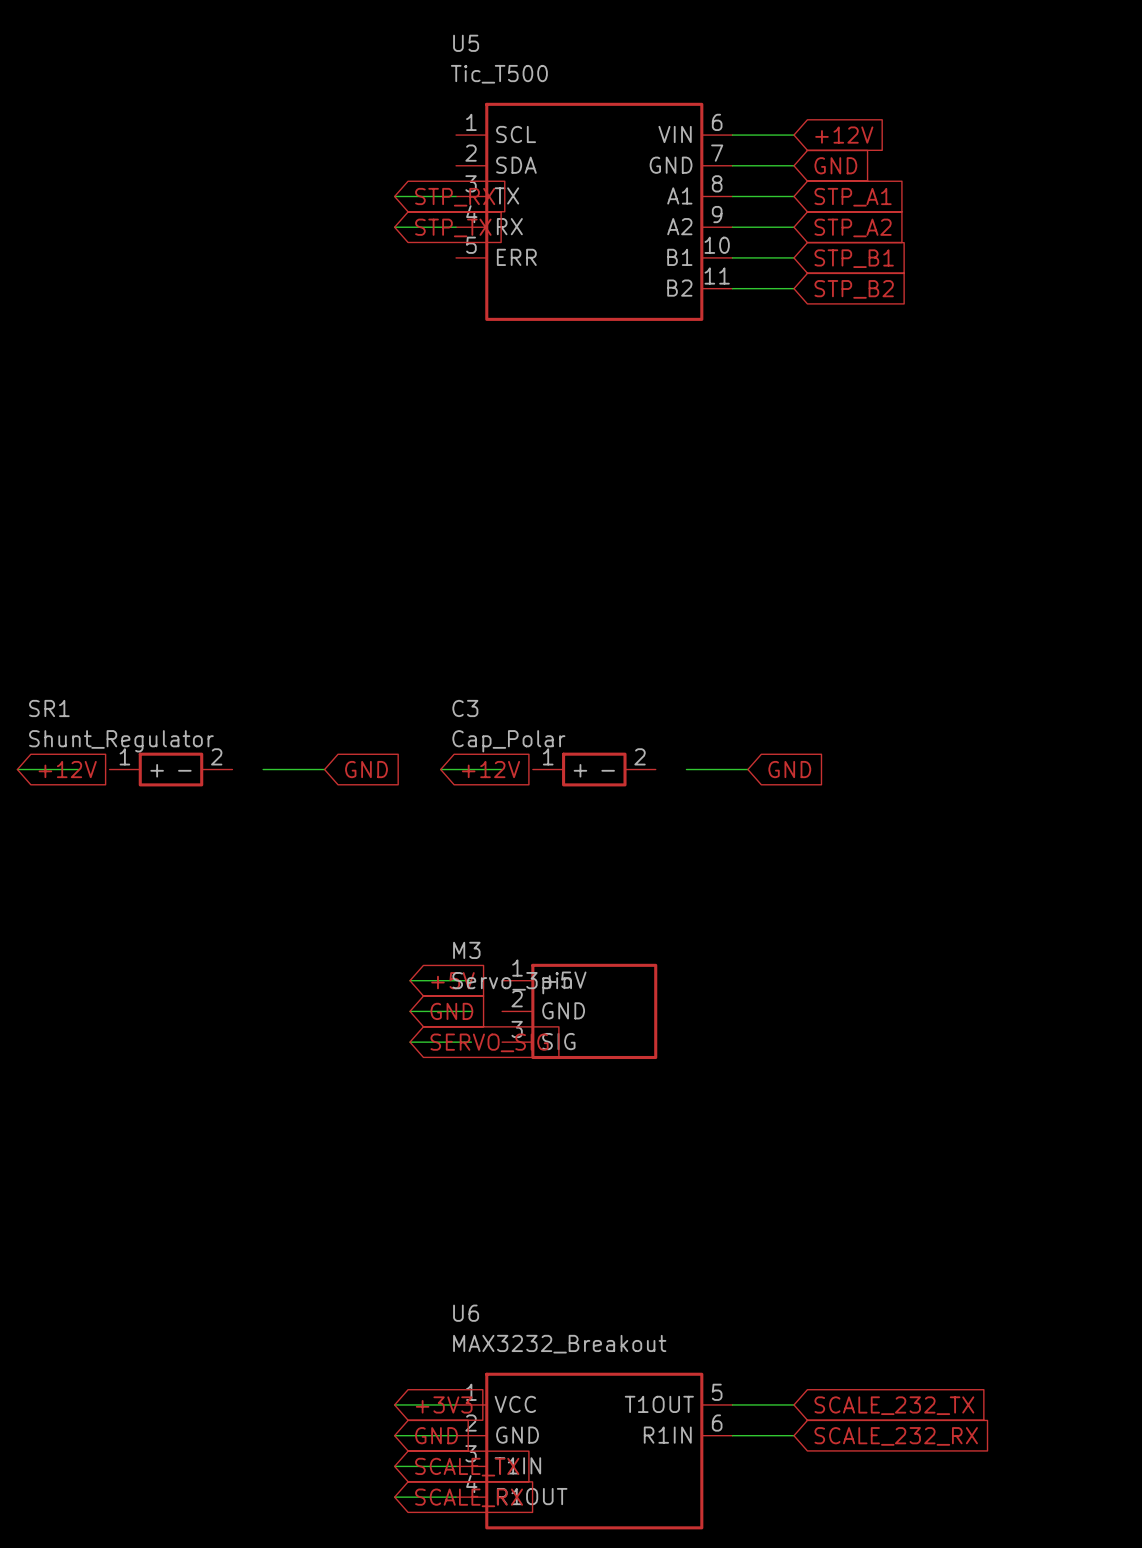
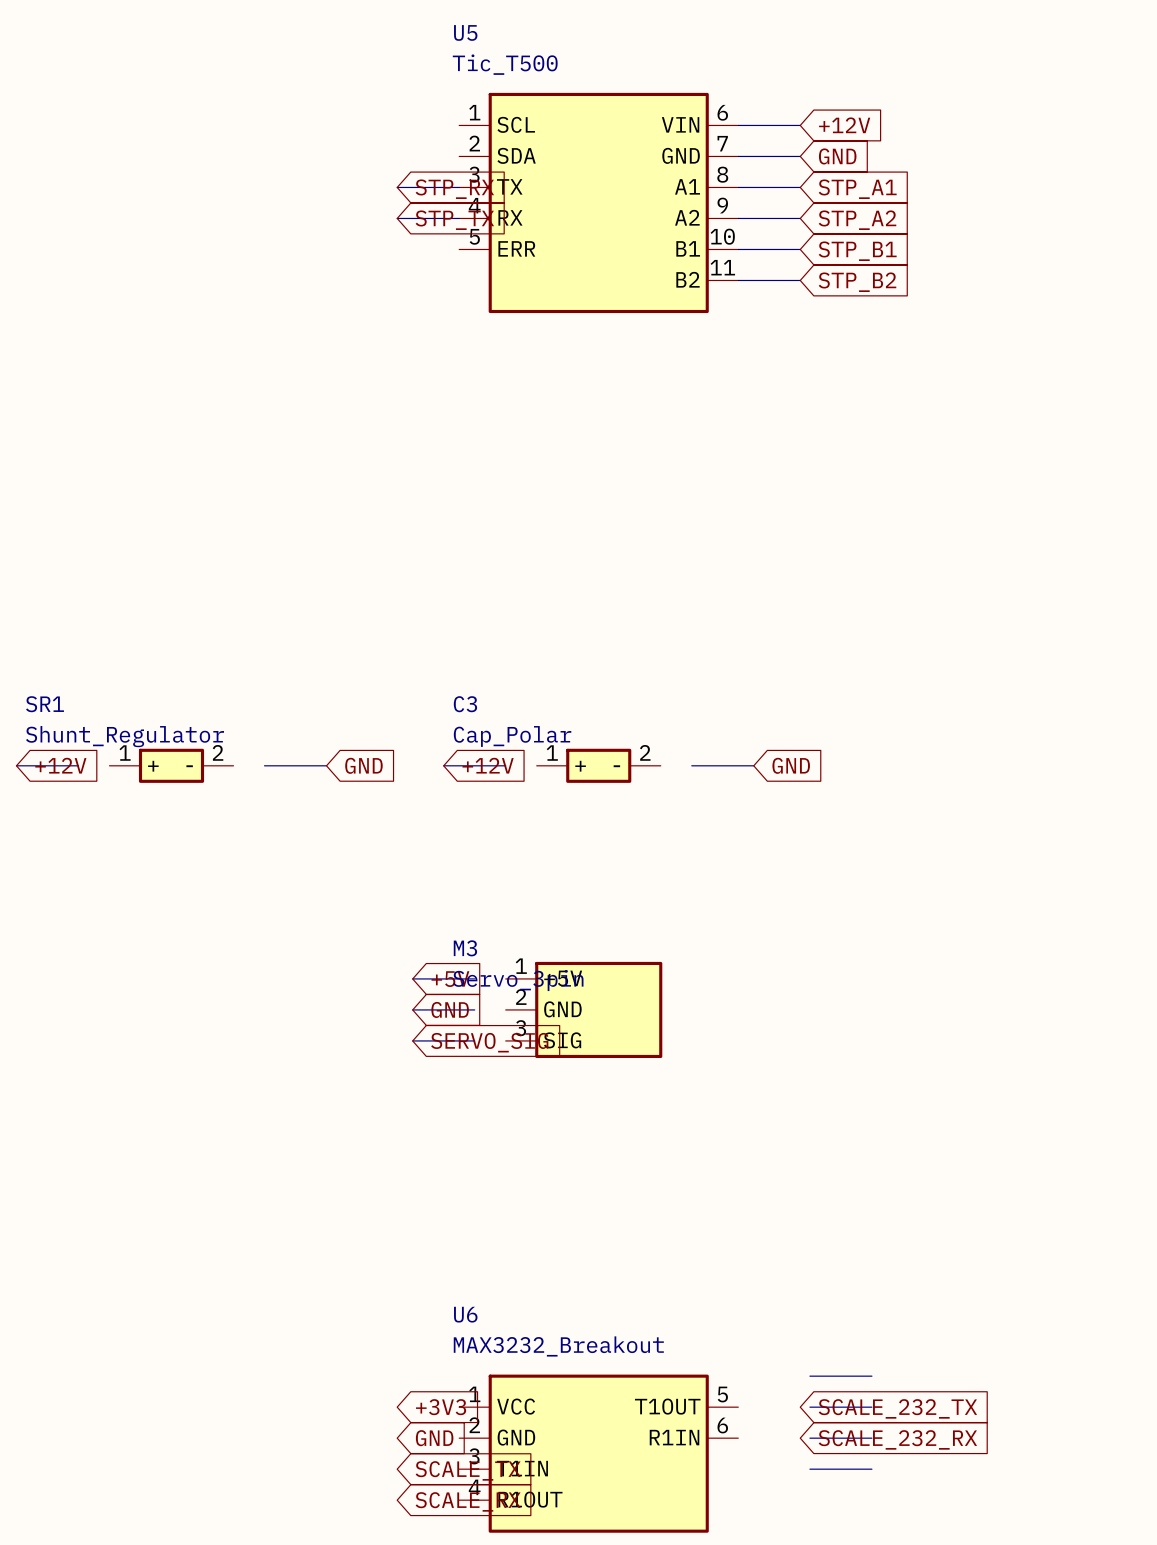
wire: none -> (809, 1376) (871, 1376)
wire: (394, 1404) (456, 1404) -> none
wire: (732, 1404) (793, 1404) -> (809, 1407) (871, 1407)
wire: (394, 1435) (456, 1435) -> none
wire: (732, 1435) (793, 1435) -> (809, 1438) (871, 1438)
wire: (394, 1466) (456, 1466) -> none
wire: none -> (809, 1469) (871, 1469)
wire: (394, 1497) (456, 1497) -> none

